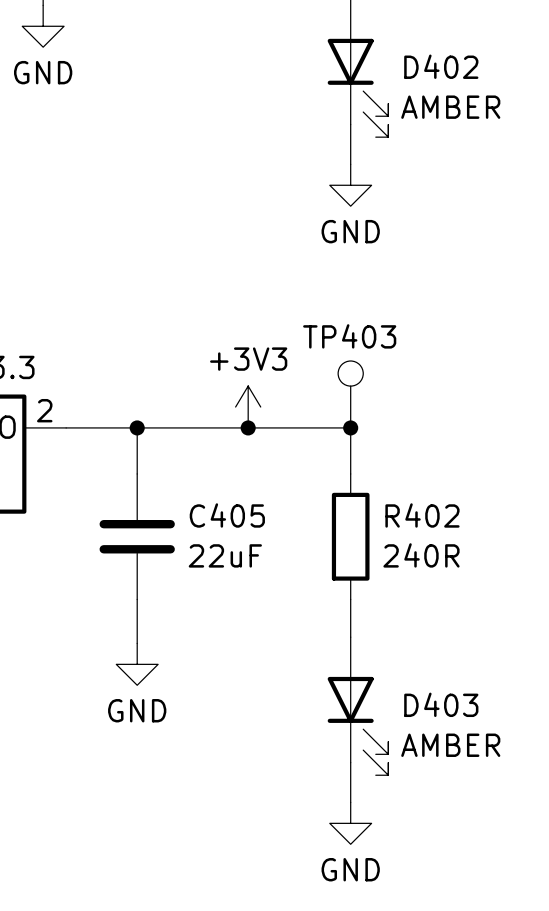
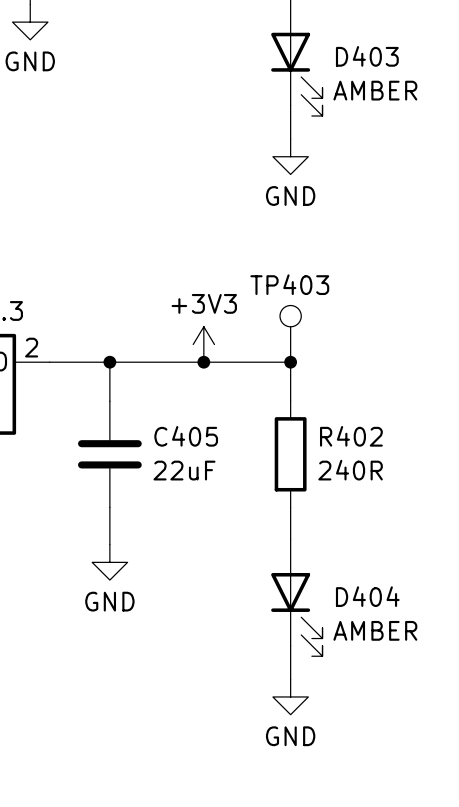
D402 name: D402 (441, 66) -> D403 (367, 56)
D403 name: D403 (441, 704) -> D404 (367, 596)

